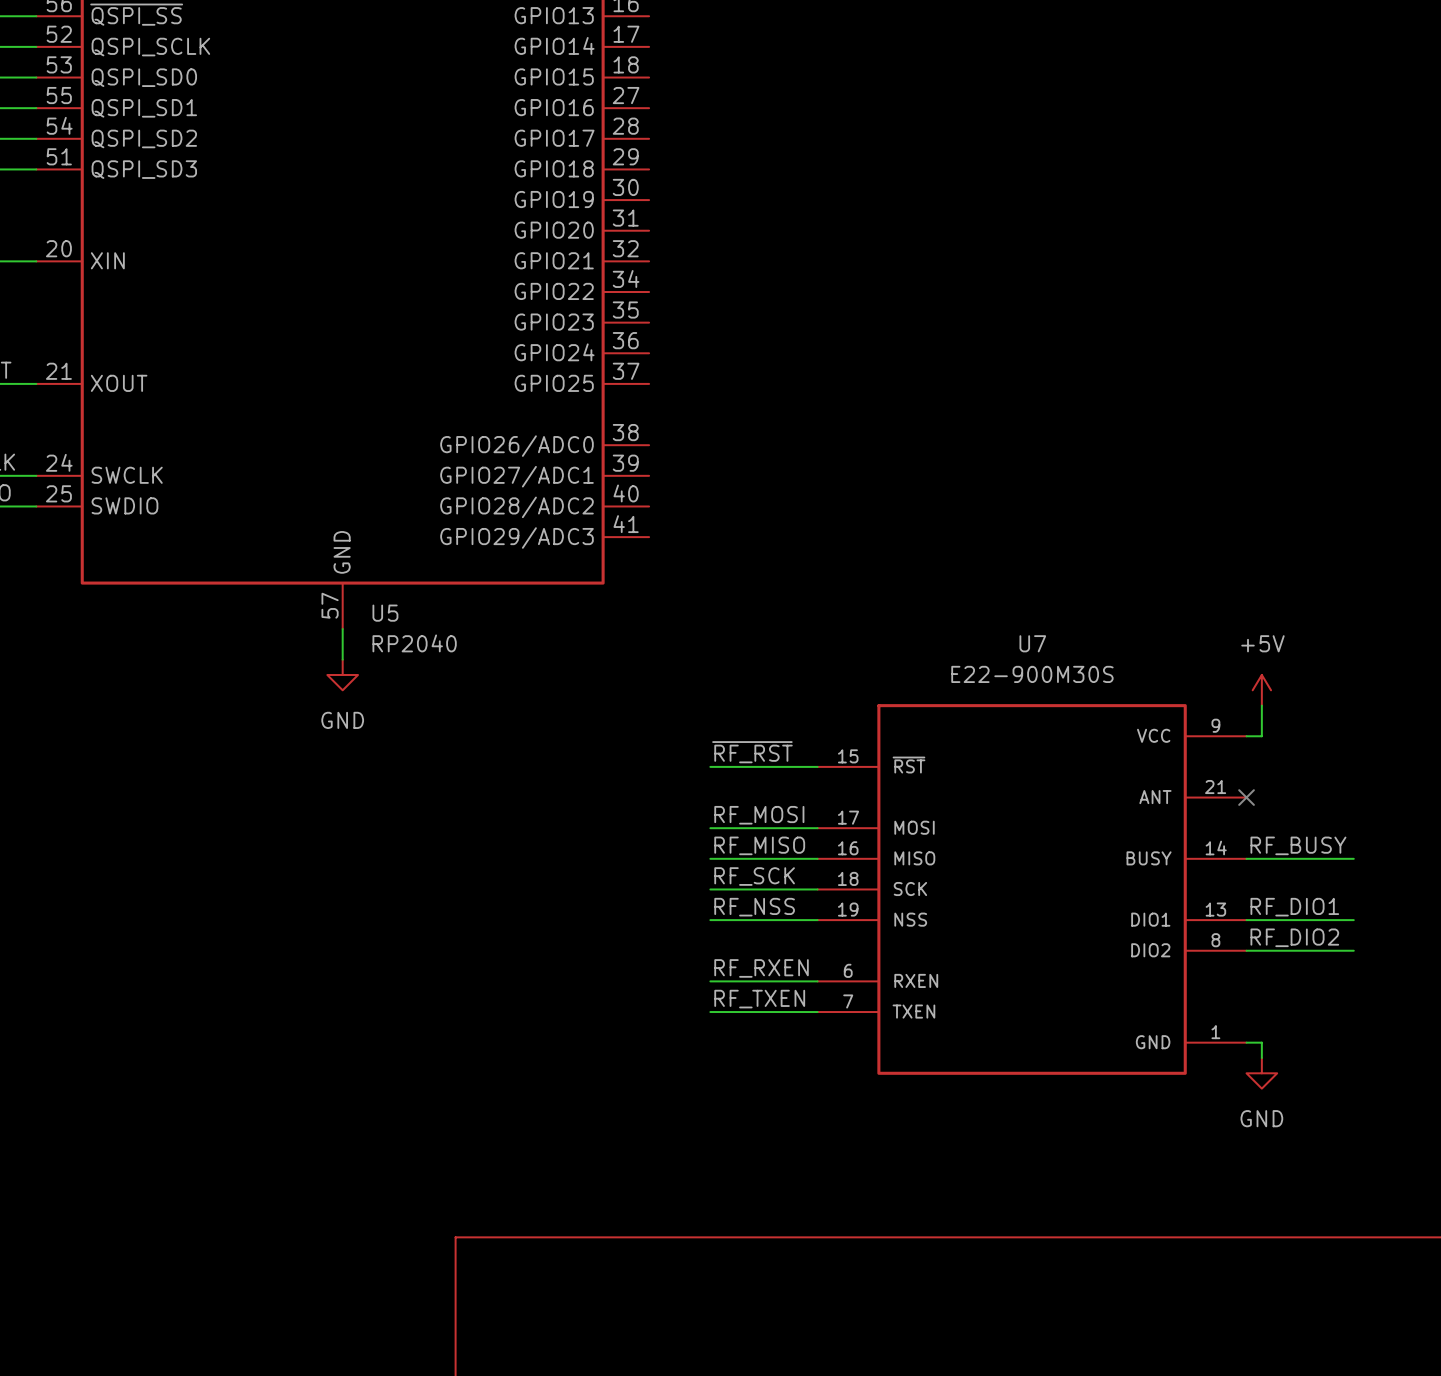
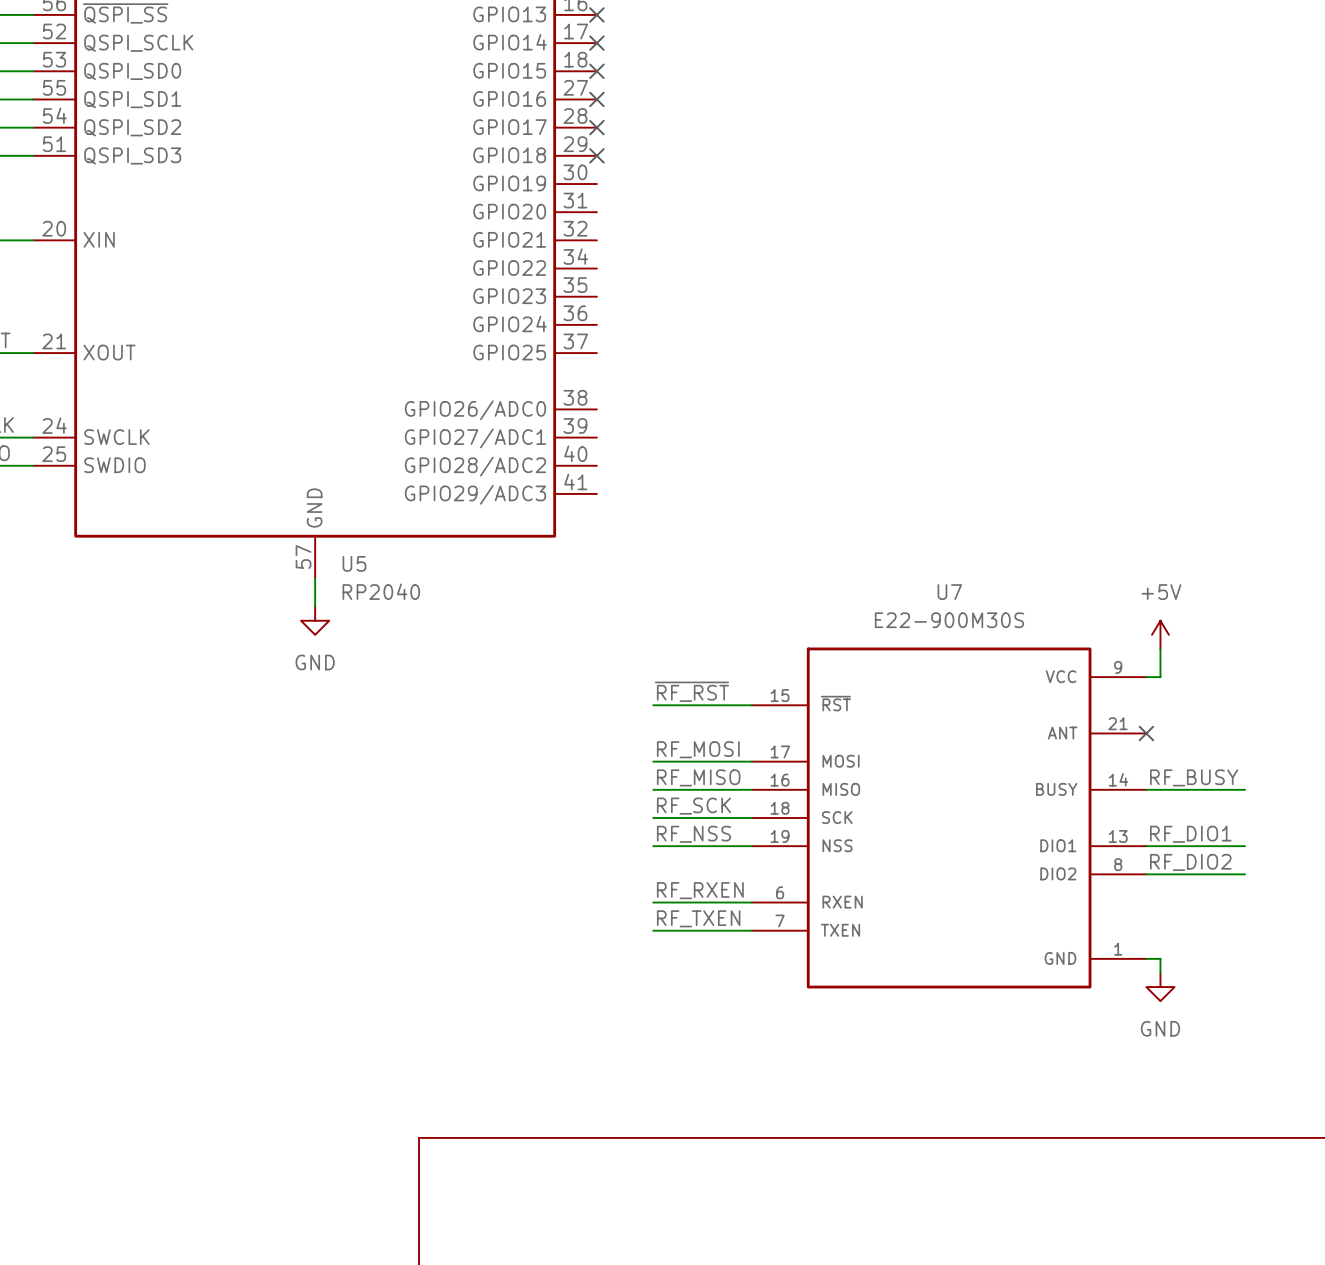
no-connect mark: none -> (596, 14)
no-connect mark: none -> (596, 43)
no-connect mark: none -> (596, 71)
no-connect mark: none -> (596, 99)
no-connect mark: none -> (596, 127)
no-connect mark: none -> (596, 155)

